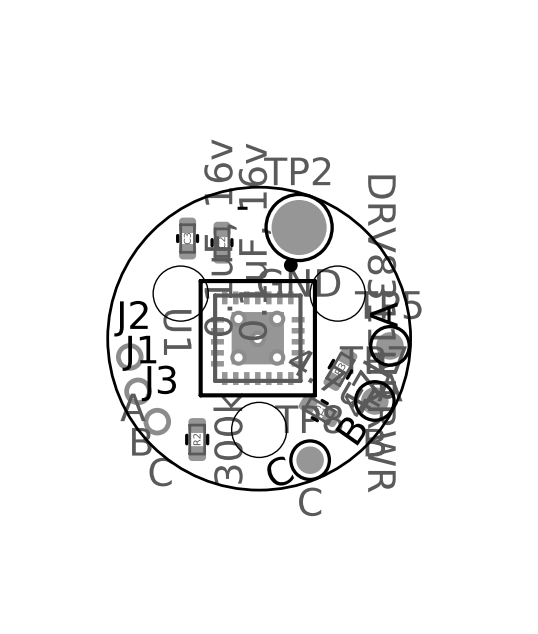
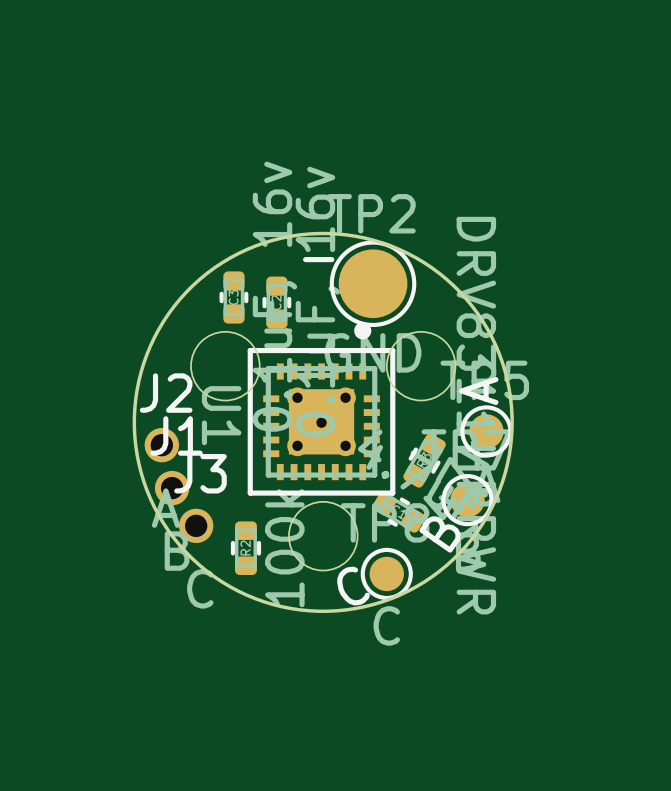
R2 value: 300k (228, 438) -> 100k (284, 548)

